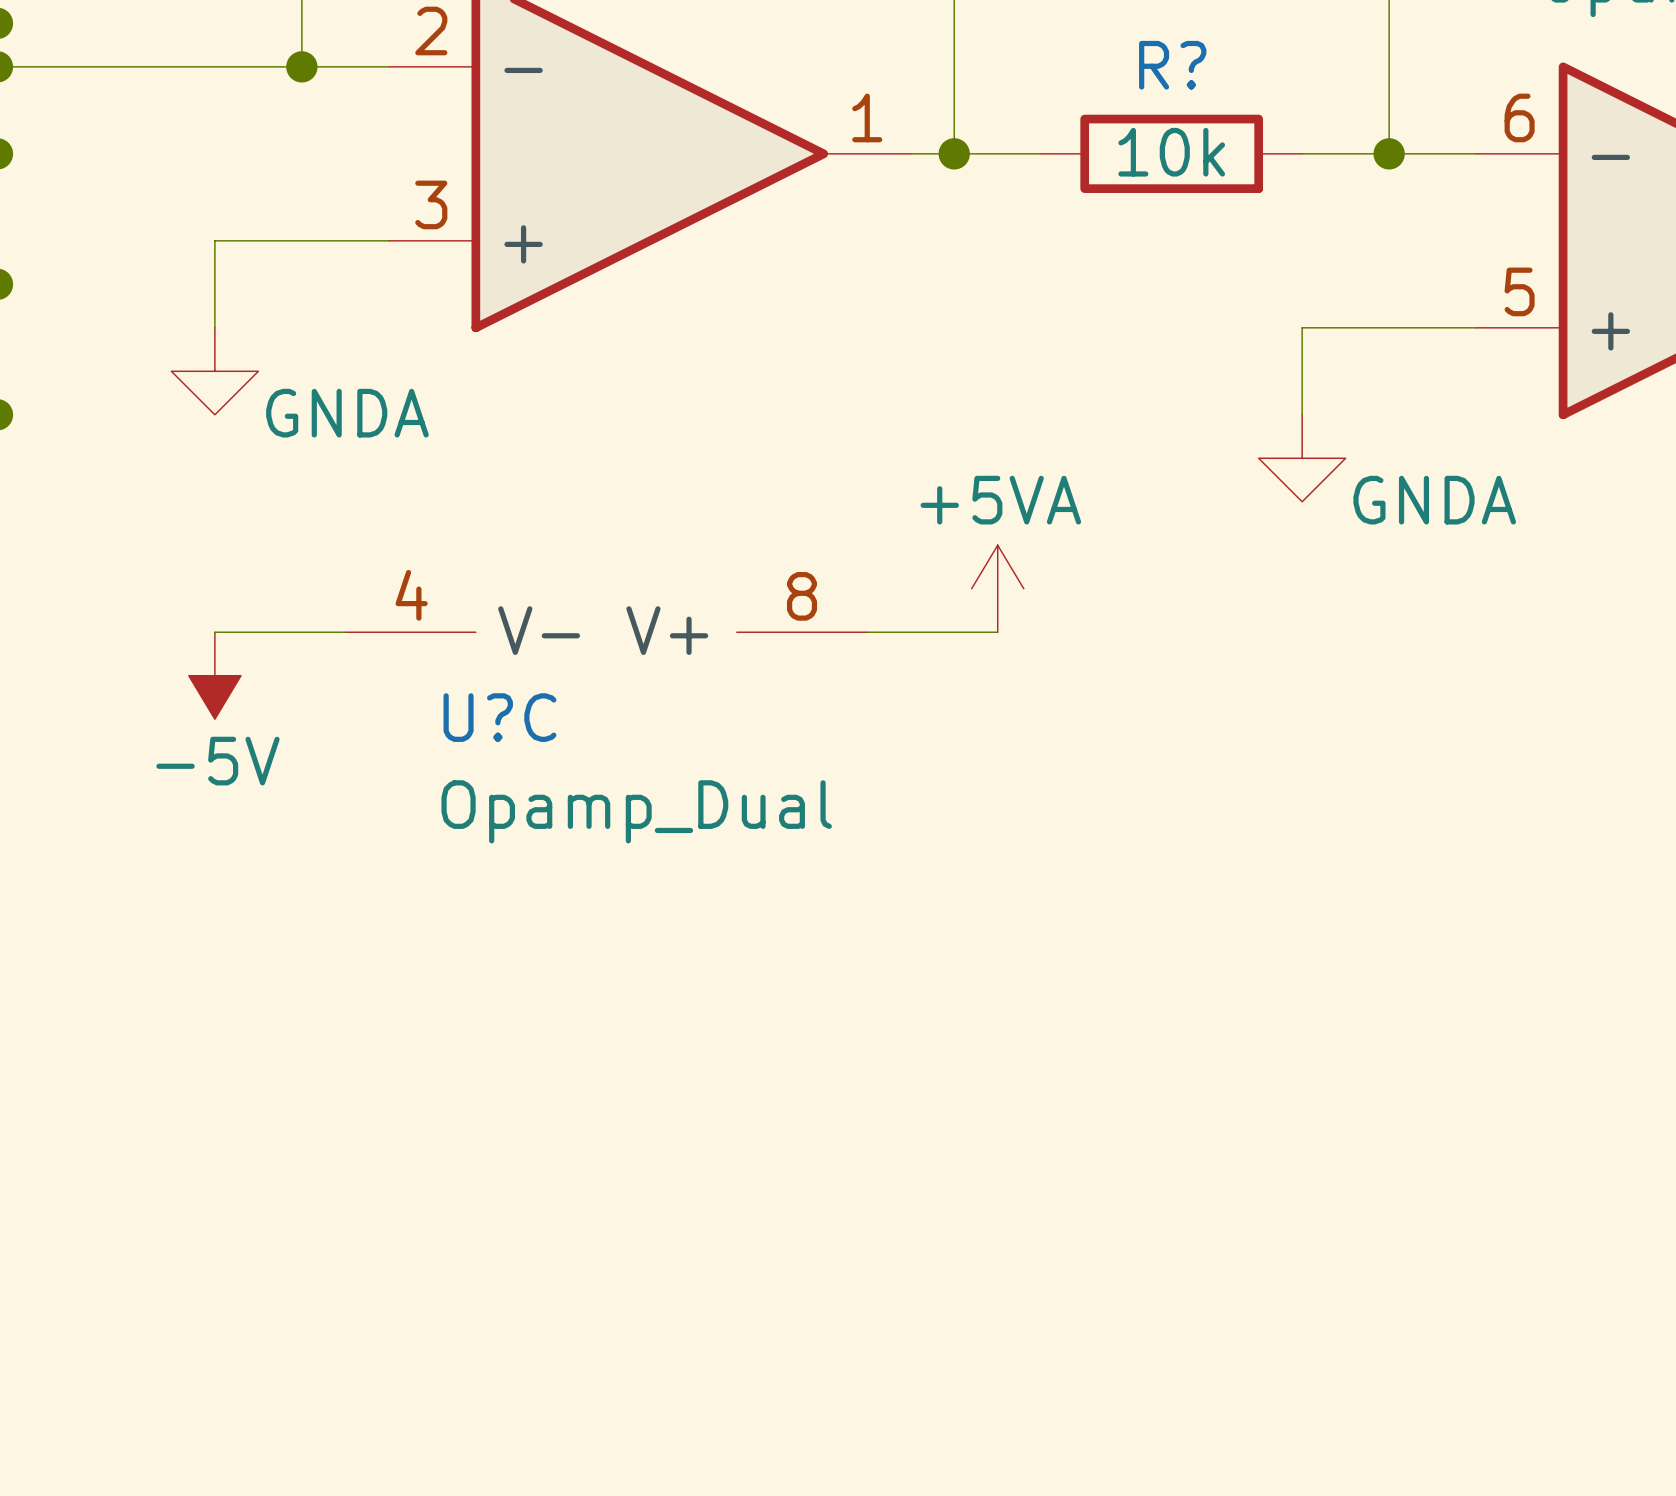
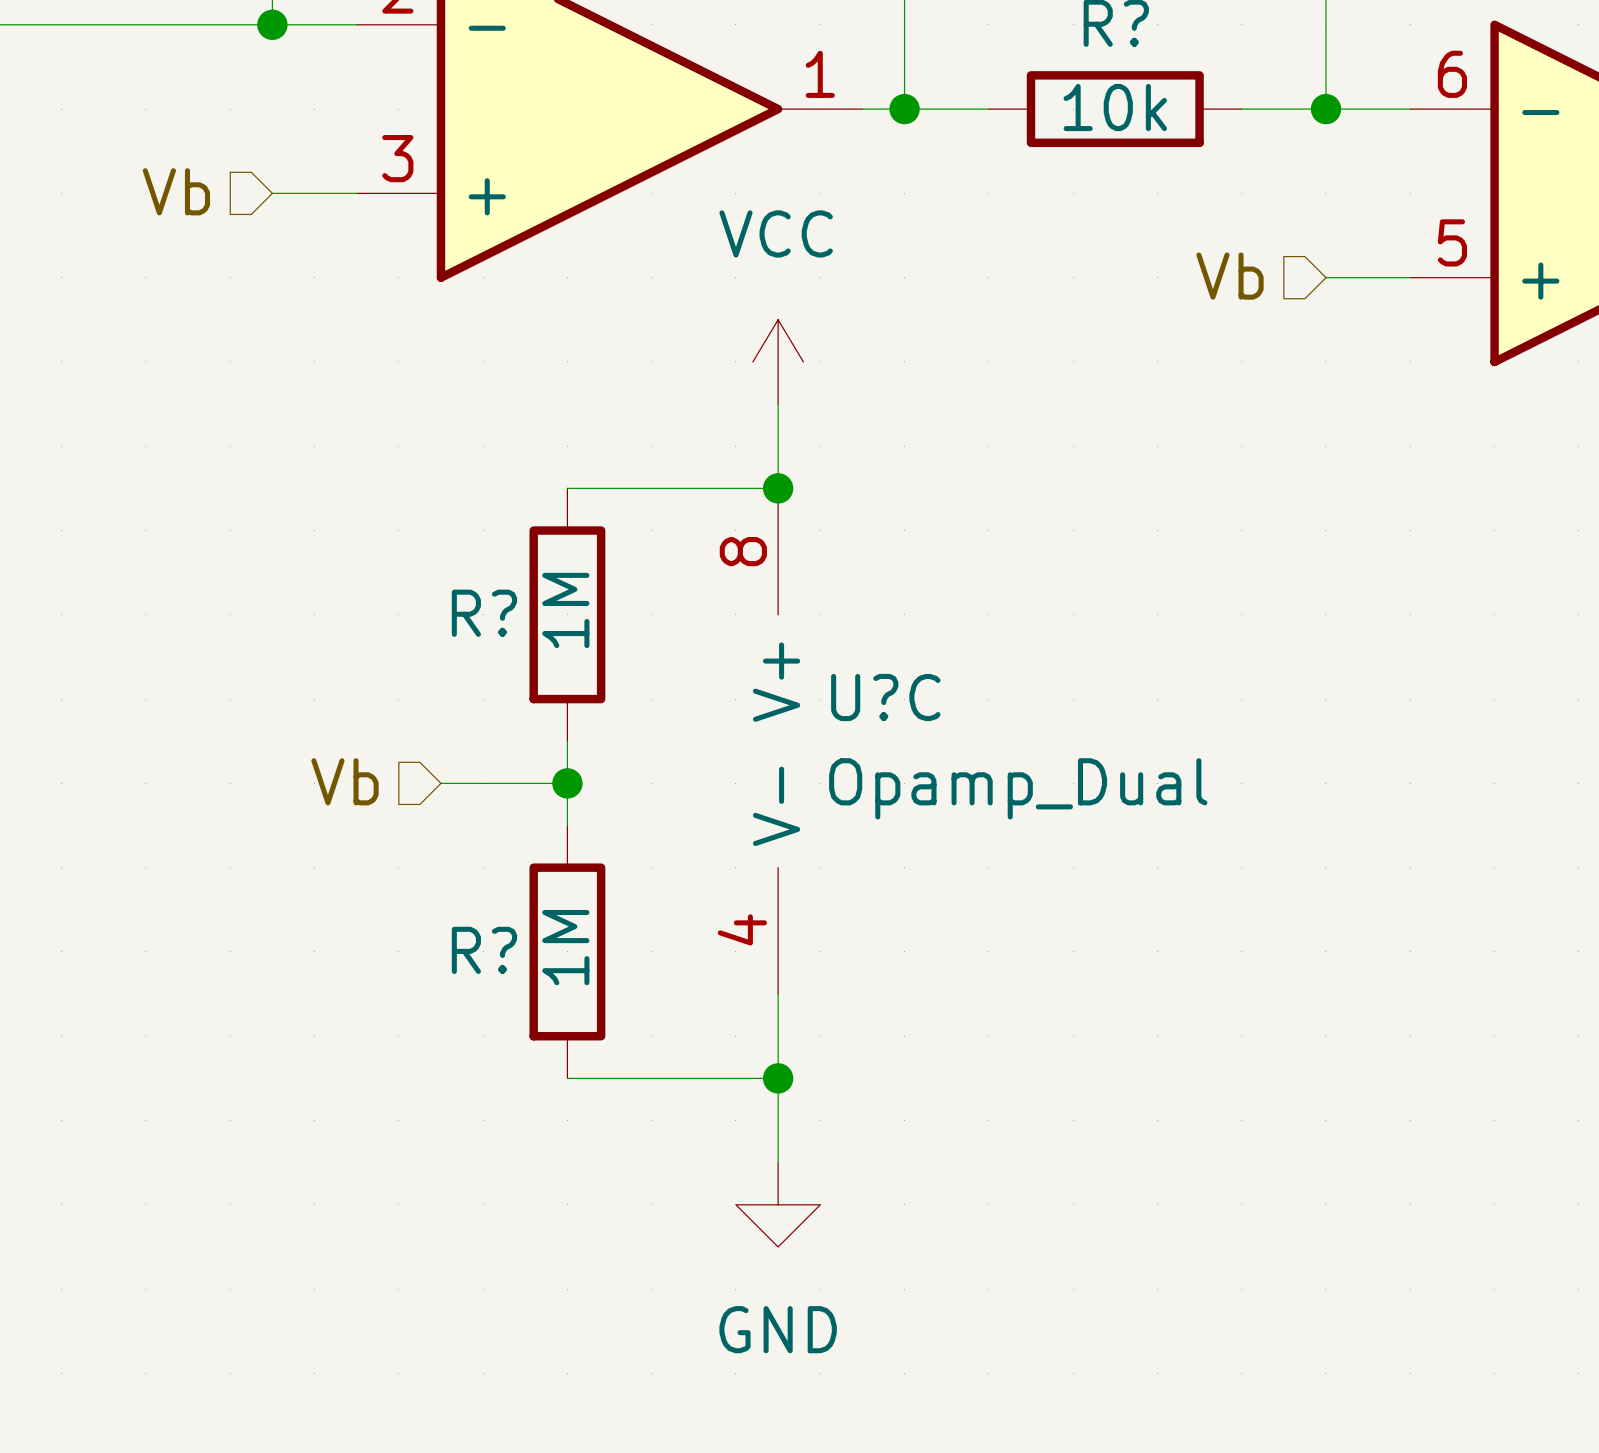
hierarchical label: none -> Vb (176, 191)
wire: (301, 240) (214, 240) (214, 327) -> none
hierarchical label: none -> Vb (1230, 276)
wire: (1389, 327) (1302, 327) (1302, 414) -> none
power symbol: GNDA (214, 371) -> none
power symbol: none -> VCC (778, 361)
wire: none -> (778, 404) (778, 488) (567, 488)
power symbol: GNDA (1302, 458) -> none
junction: none -> (778, 488)
power symbol: +5VA (997, 588) -> none
wire: (214, 632) (345, 632) -> (440, 783) (567, 783)
U?C rotation: 0° (606, 632) -> 90° counterclockwise (778, 741)
wire: (867, 632) (997, 632) -> none
power symbol: -5V (214, 675) -> none
R?: none -> 1M (567, 614)
U?C name position: U?C (499, 717) -> U?C (885, 697)
wire: none -> (567, 741) (567, 825)
U?C value position: Opamp_Dual (636, 811) -> Opamp_Dual (1018, 788)
hierarchical label: none -> Vb (345, 781)
junction: none -> (567, 783)
R?: none -> 1M (567, 951)
wire: none -> (778, 994) (778, 1162)
wire: none -> (567, 1078) (778, 1078)
junction: none -> (778, 1078)
power symbol: none -> GND (778, 1204)

